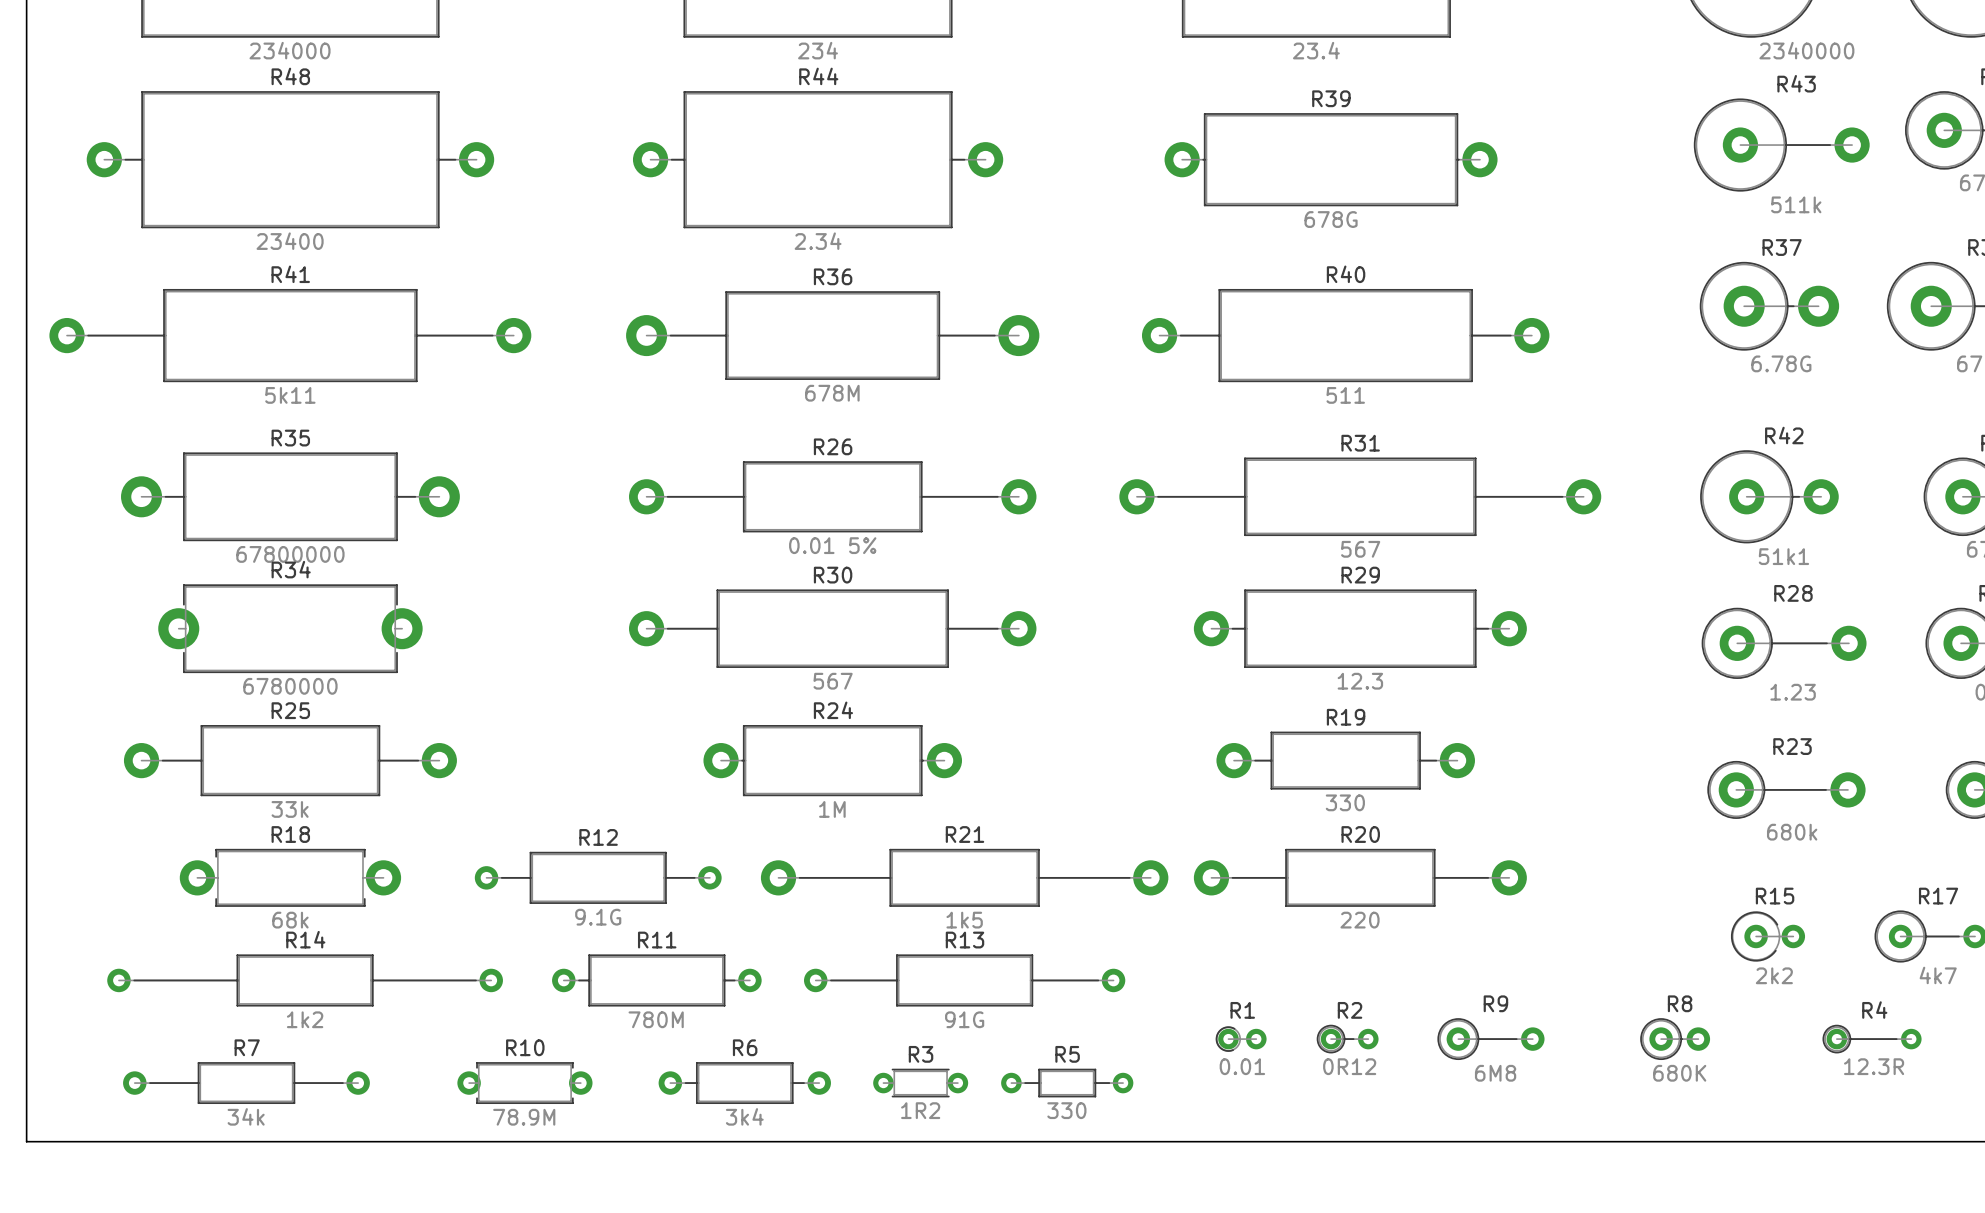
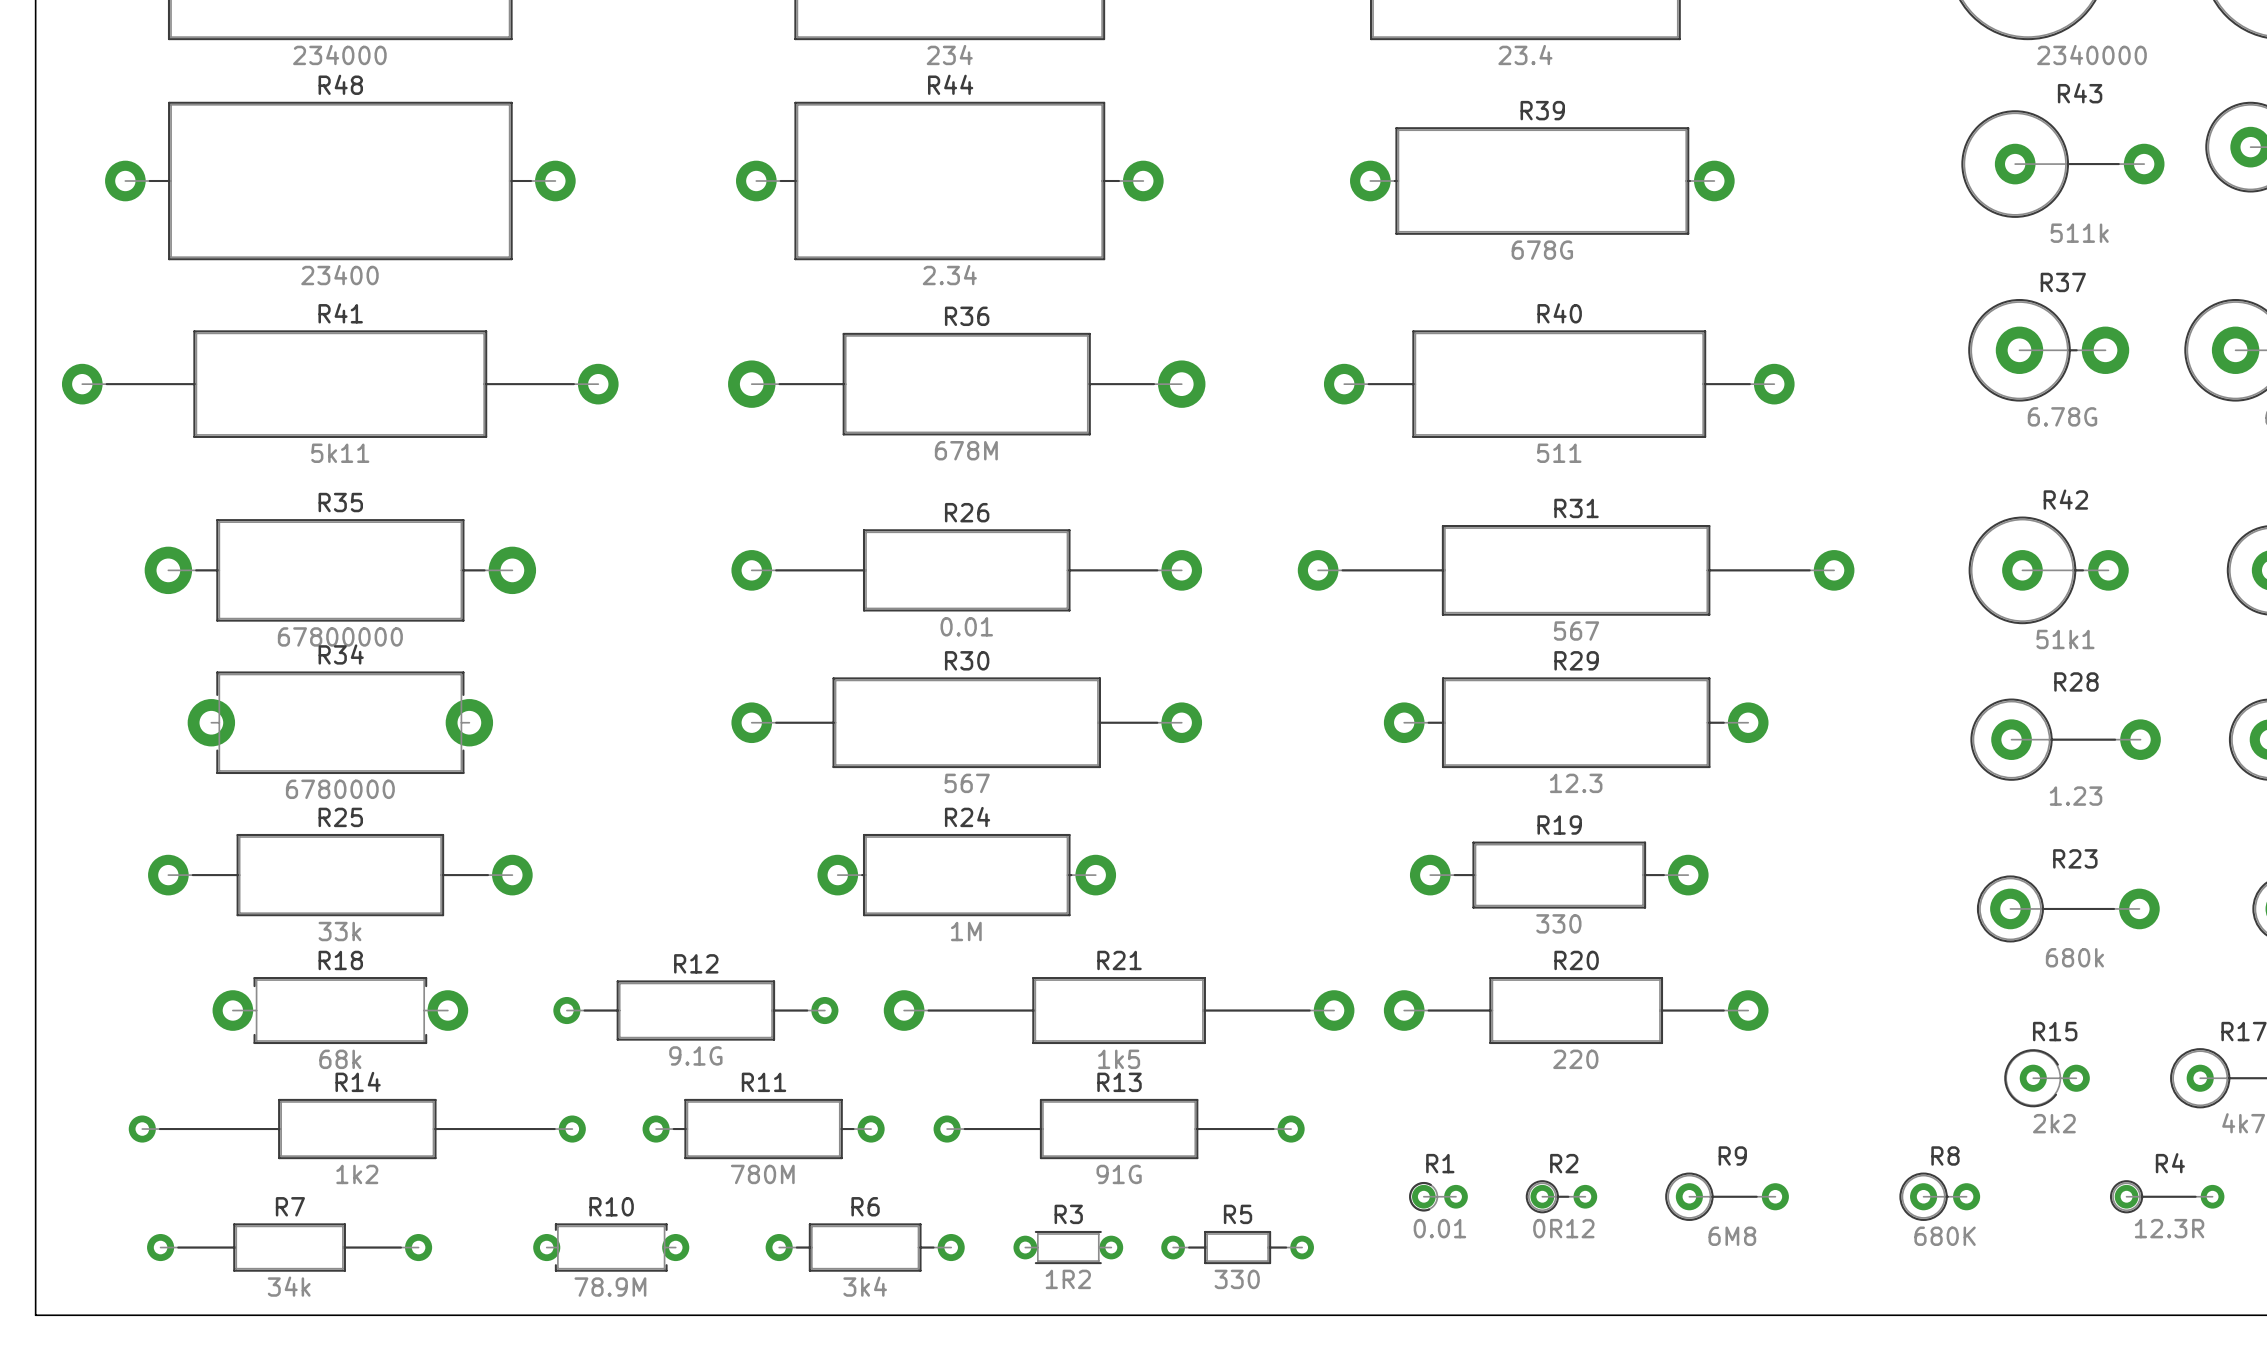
R26 value: 0.01 5% (832, 545) -> 0.01 (966, 626)

